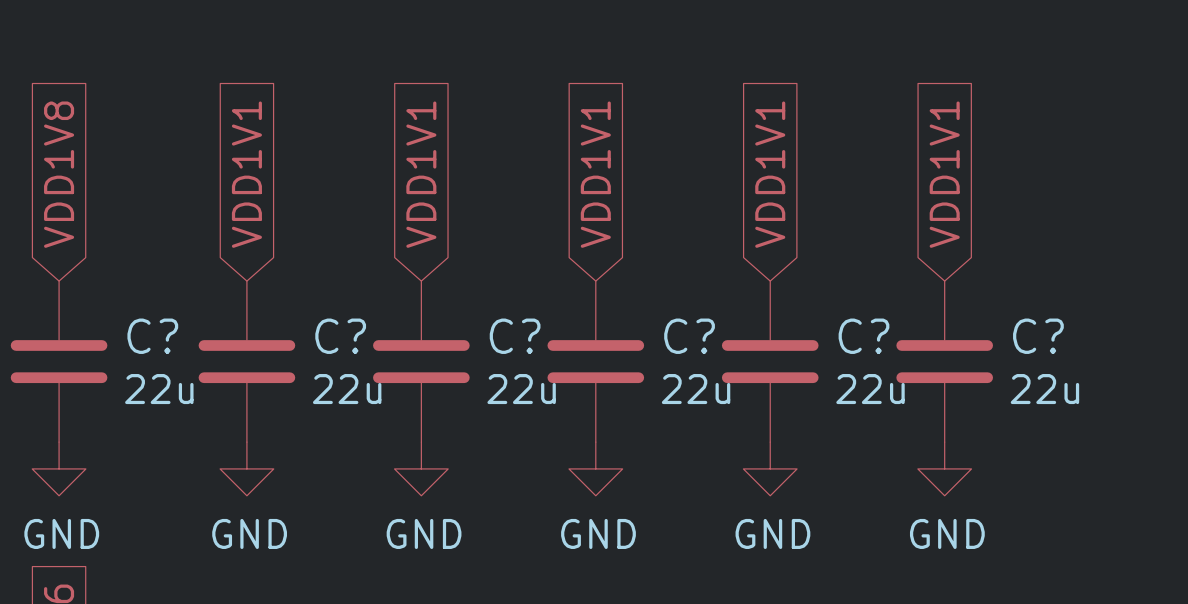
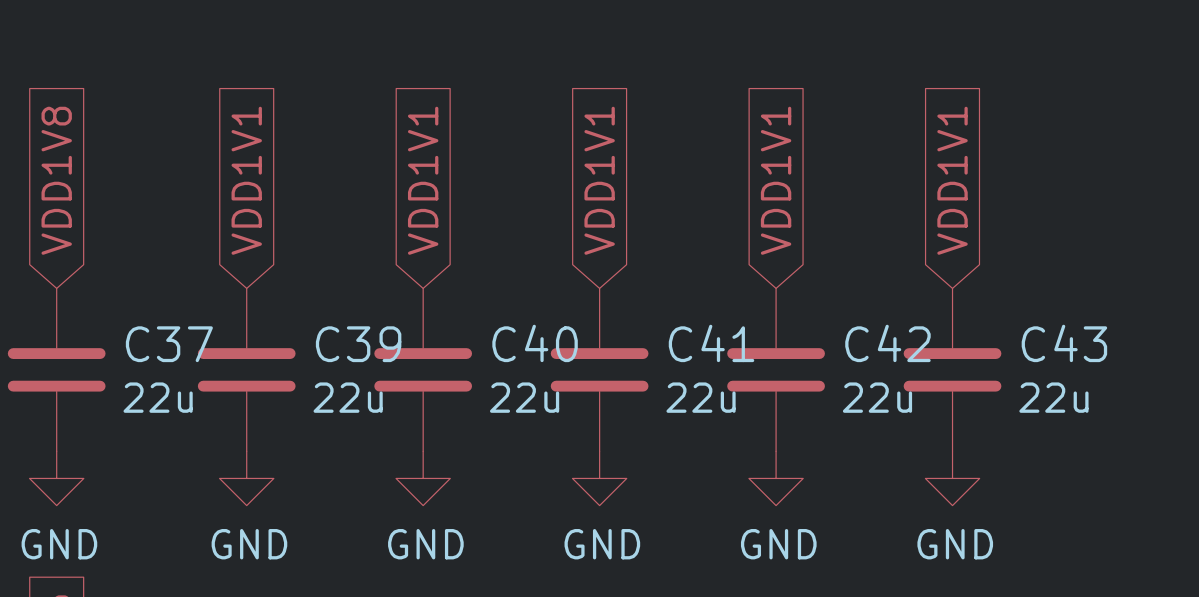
C? name: C? (152, 336) -> C37 (169, 344)
C? name: C? (340, 336) -> C39 (358, 344)
C? name: C? (515, 336) -> C40 (535, 343)
C? name: C? (689, 336) -> C41 (711, 343)
C? name: C? (863, 336) -> C42 (887, 343)
C? name: C? (1038, 336) -> C43 (1064, 343)

